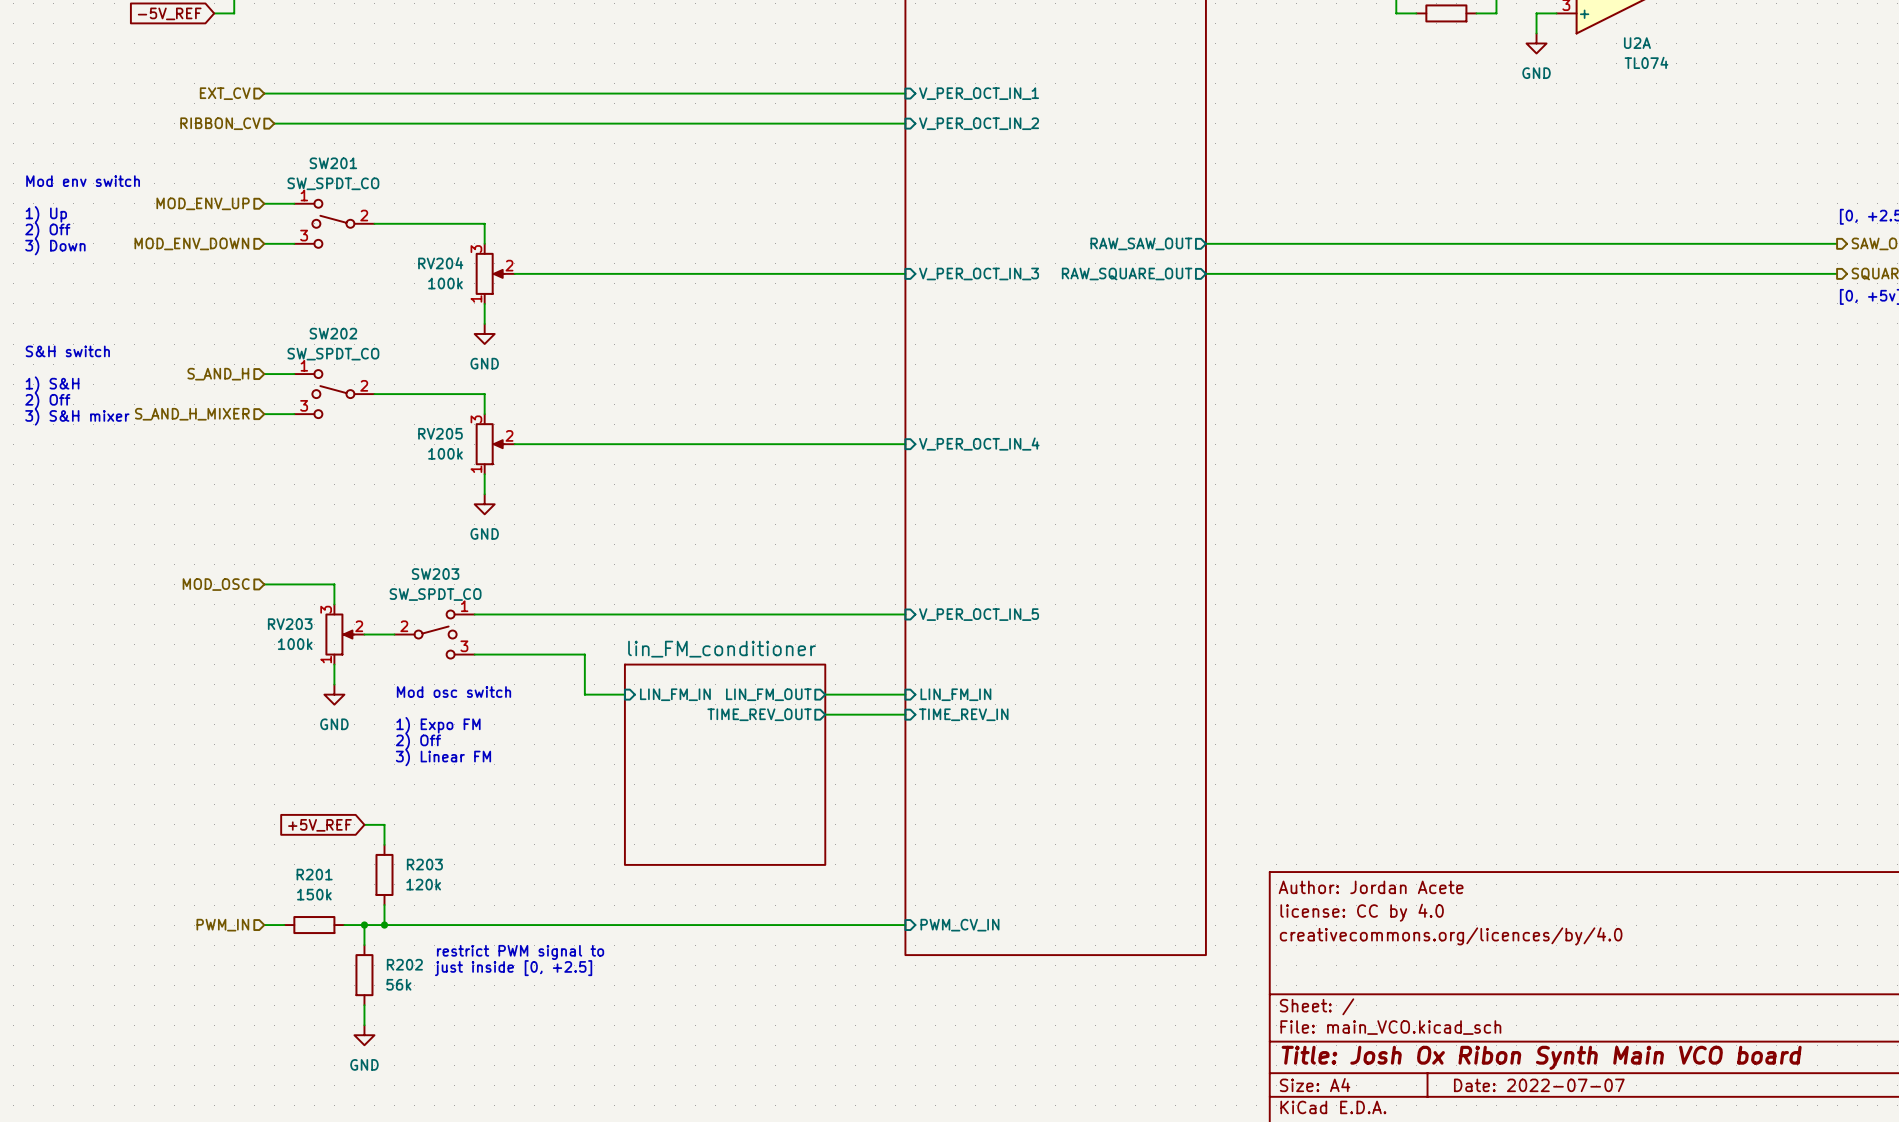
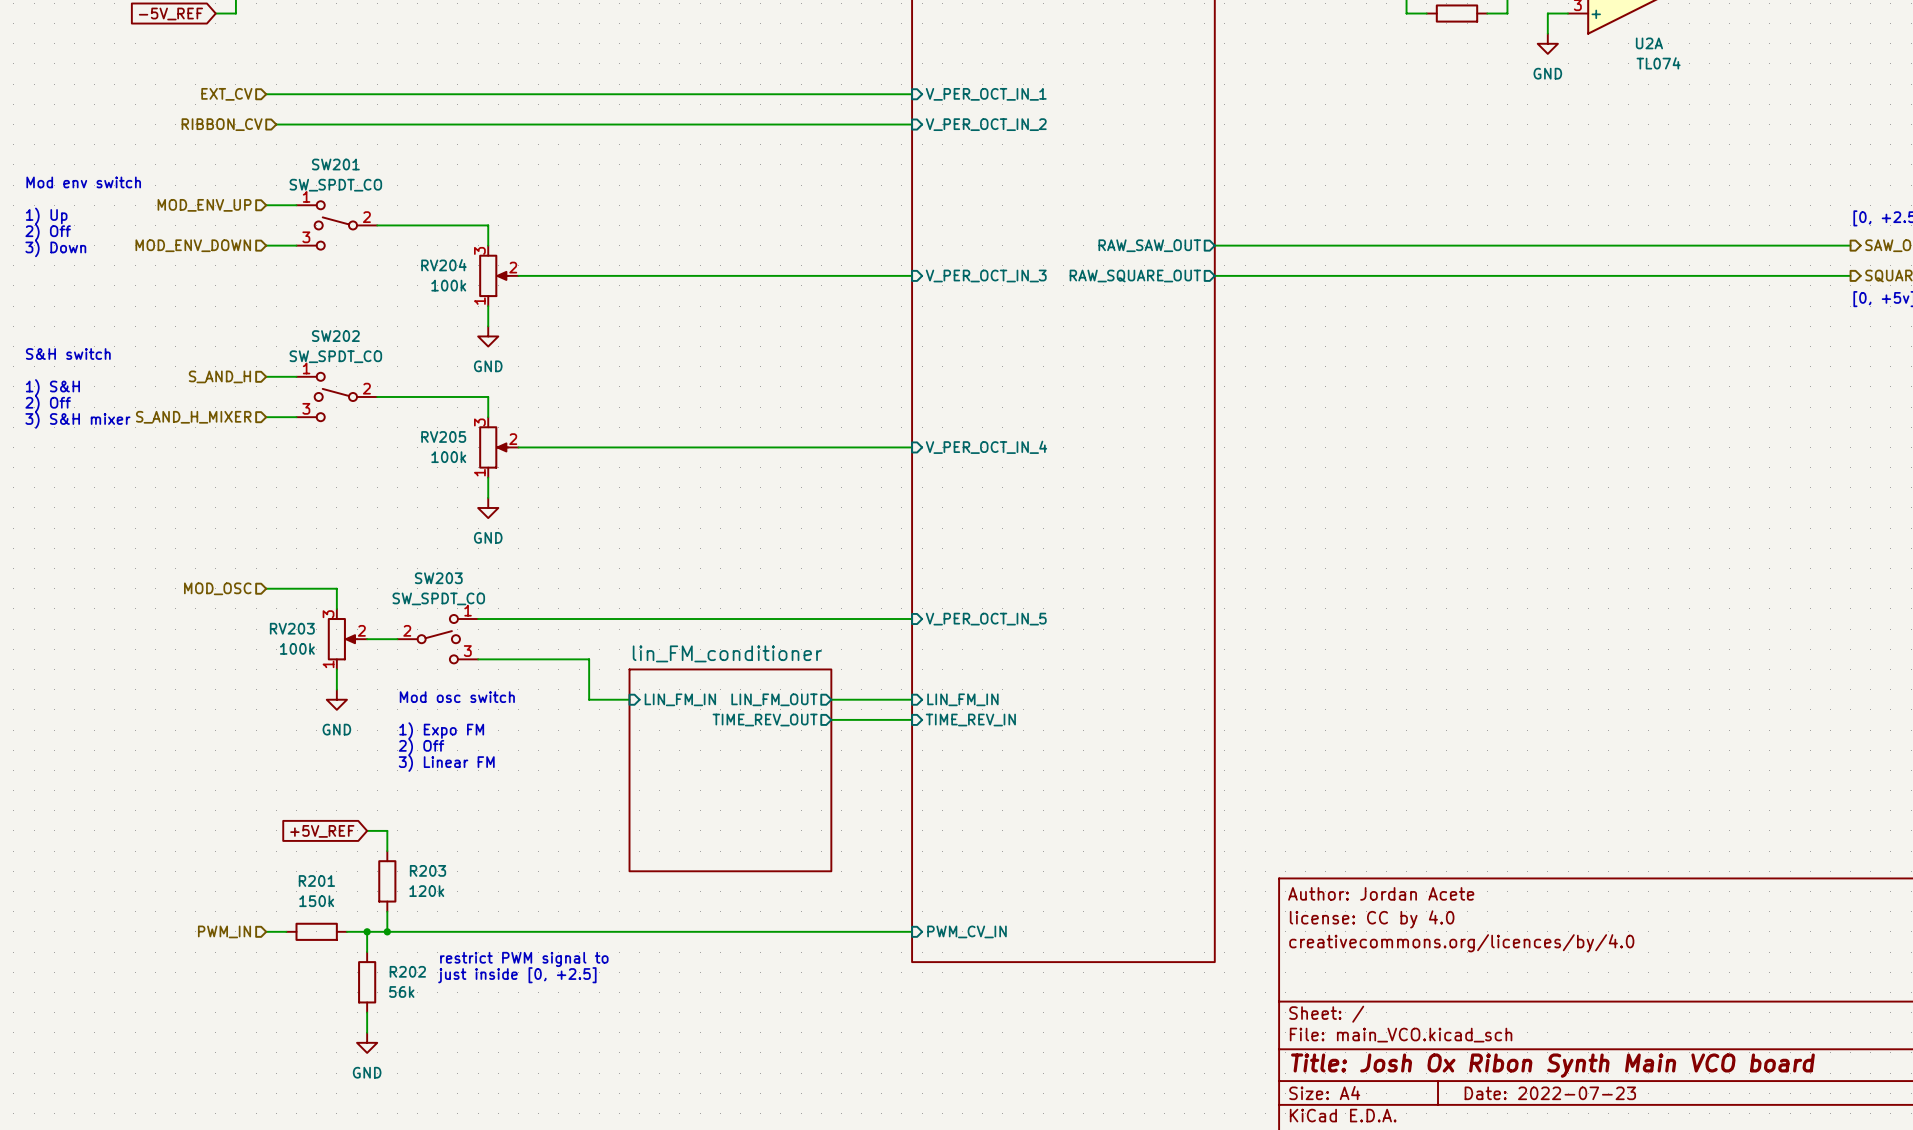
title block: Date: 2022-07-07 (1539, 1085) -> Date: 2022-07-23 (1550, 1093)

